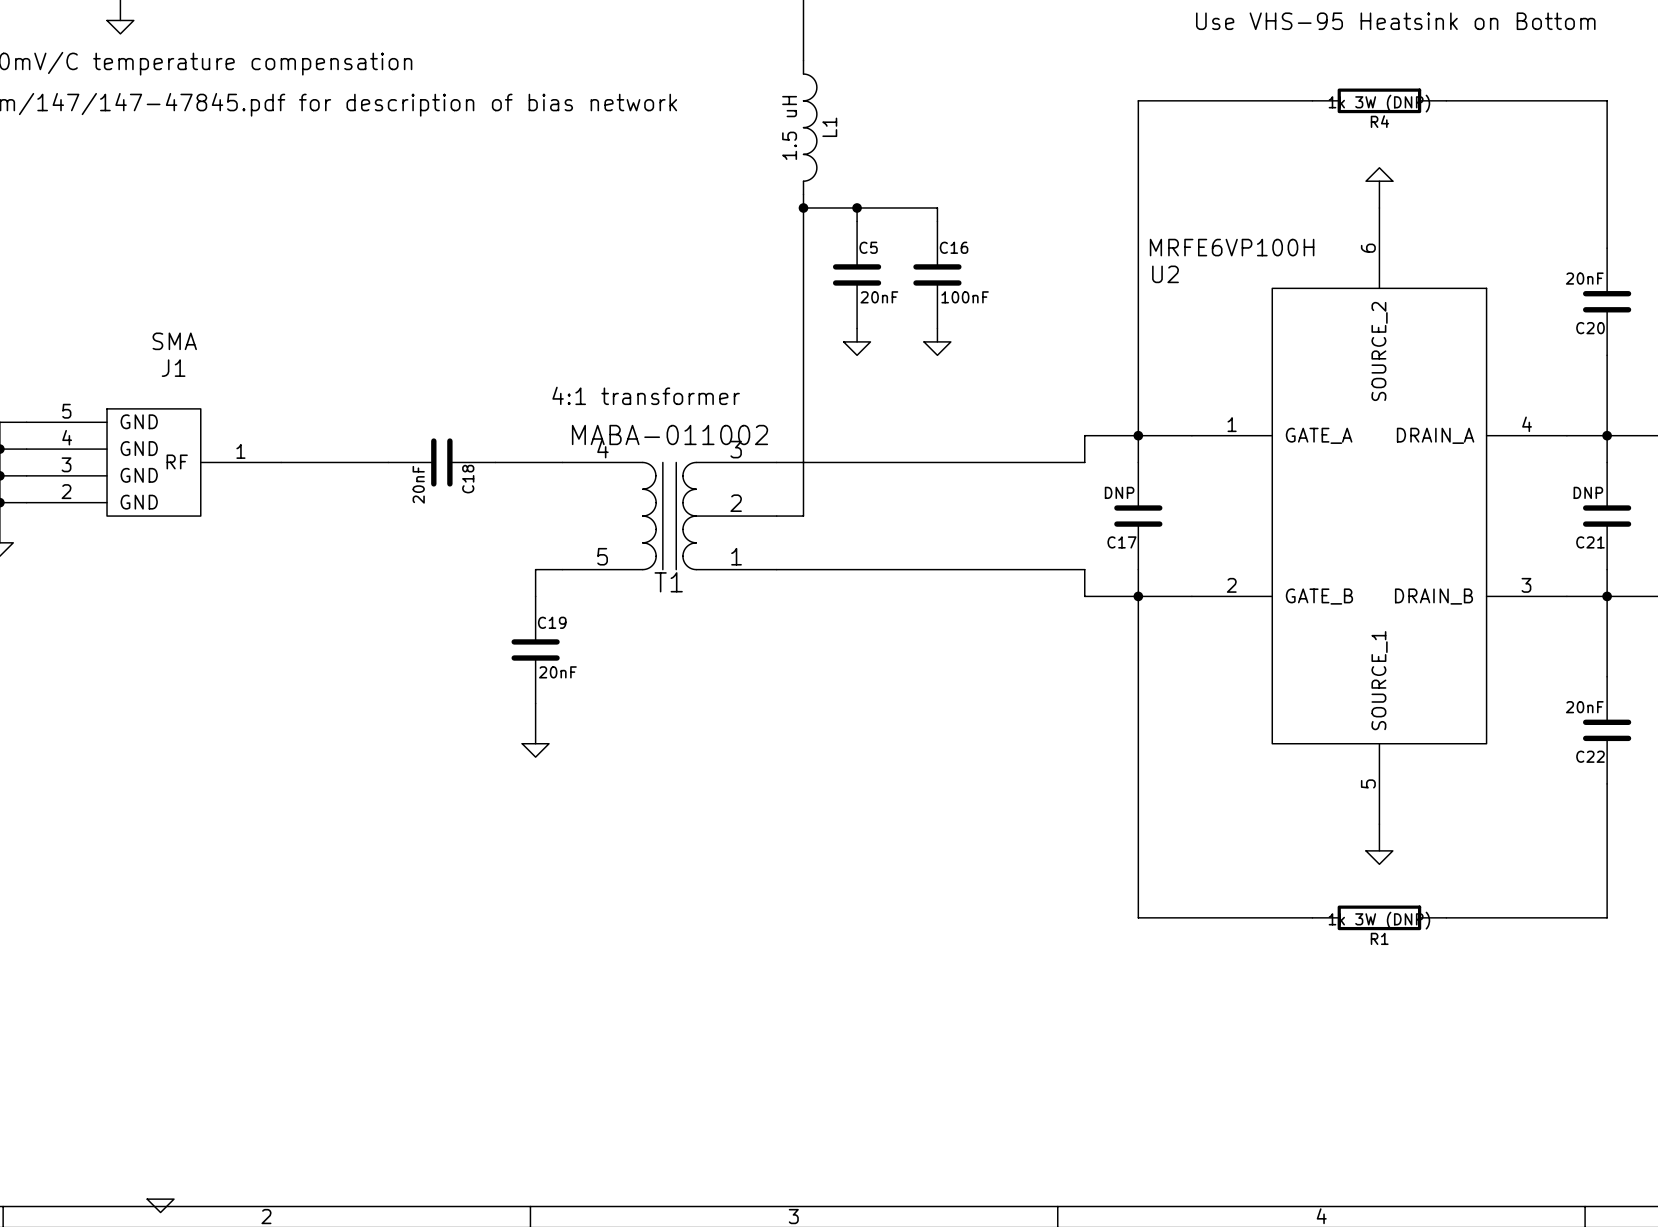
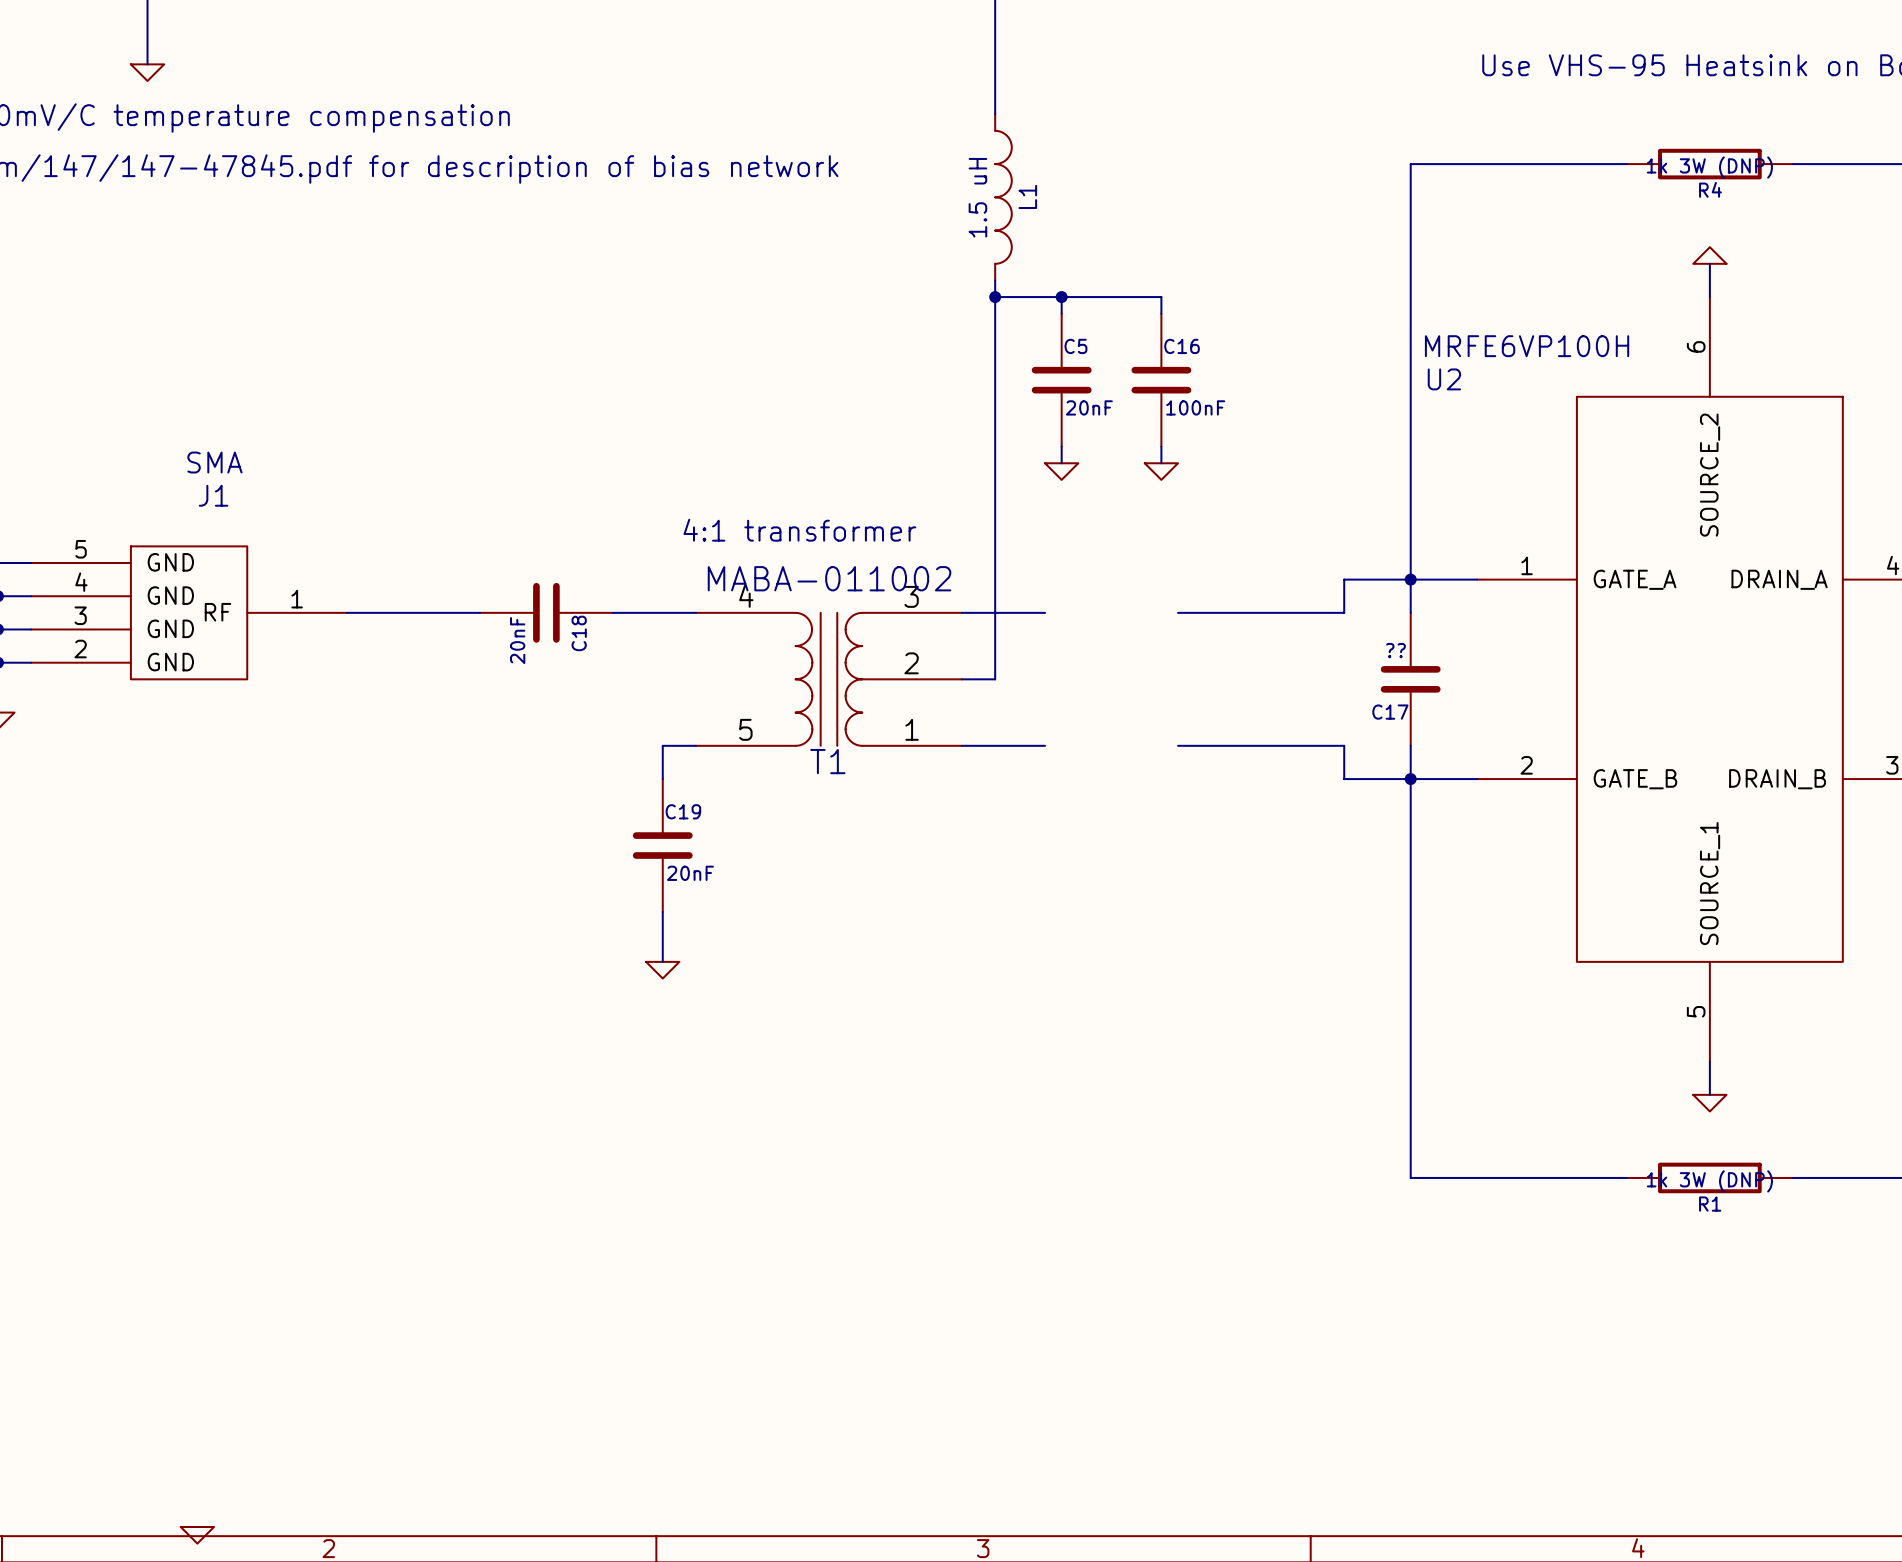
wire: (843, 462) (950, 462) -> none
C17 value: DNP (1119, 492) -> ?? (1396, 650)
wire: (843, 569) (950, 569) -> none

